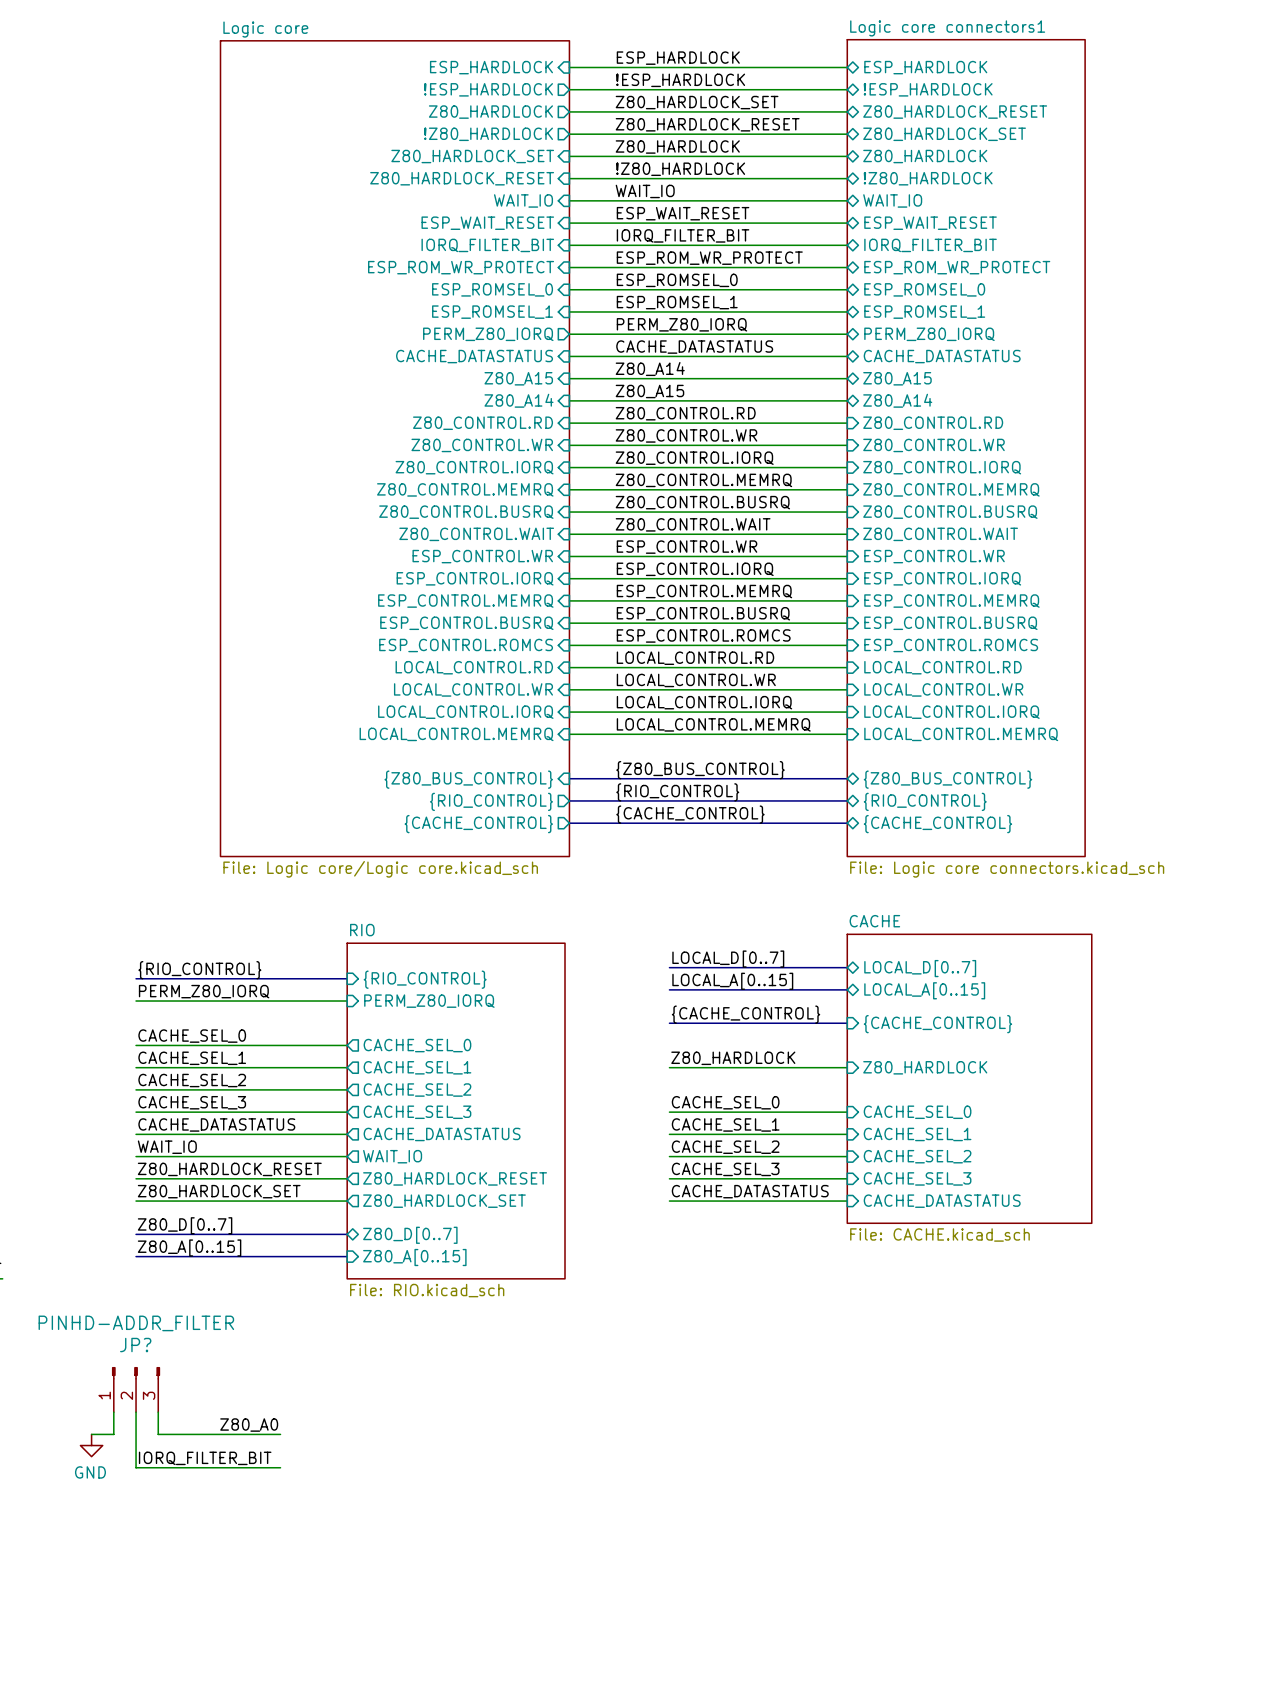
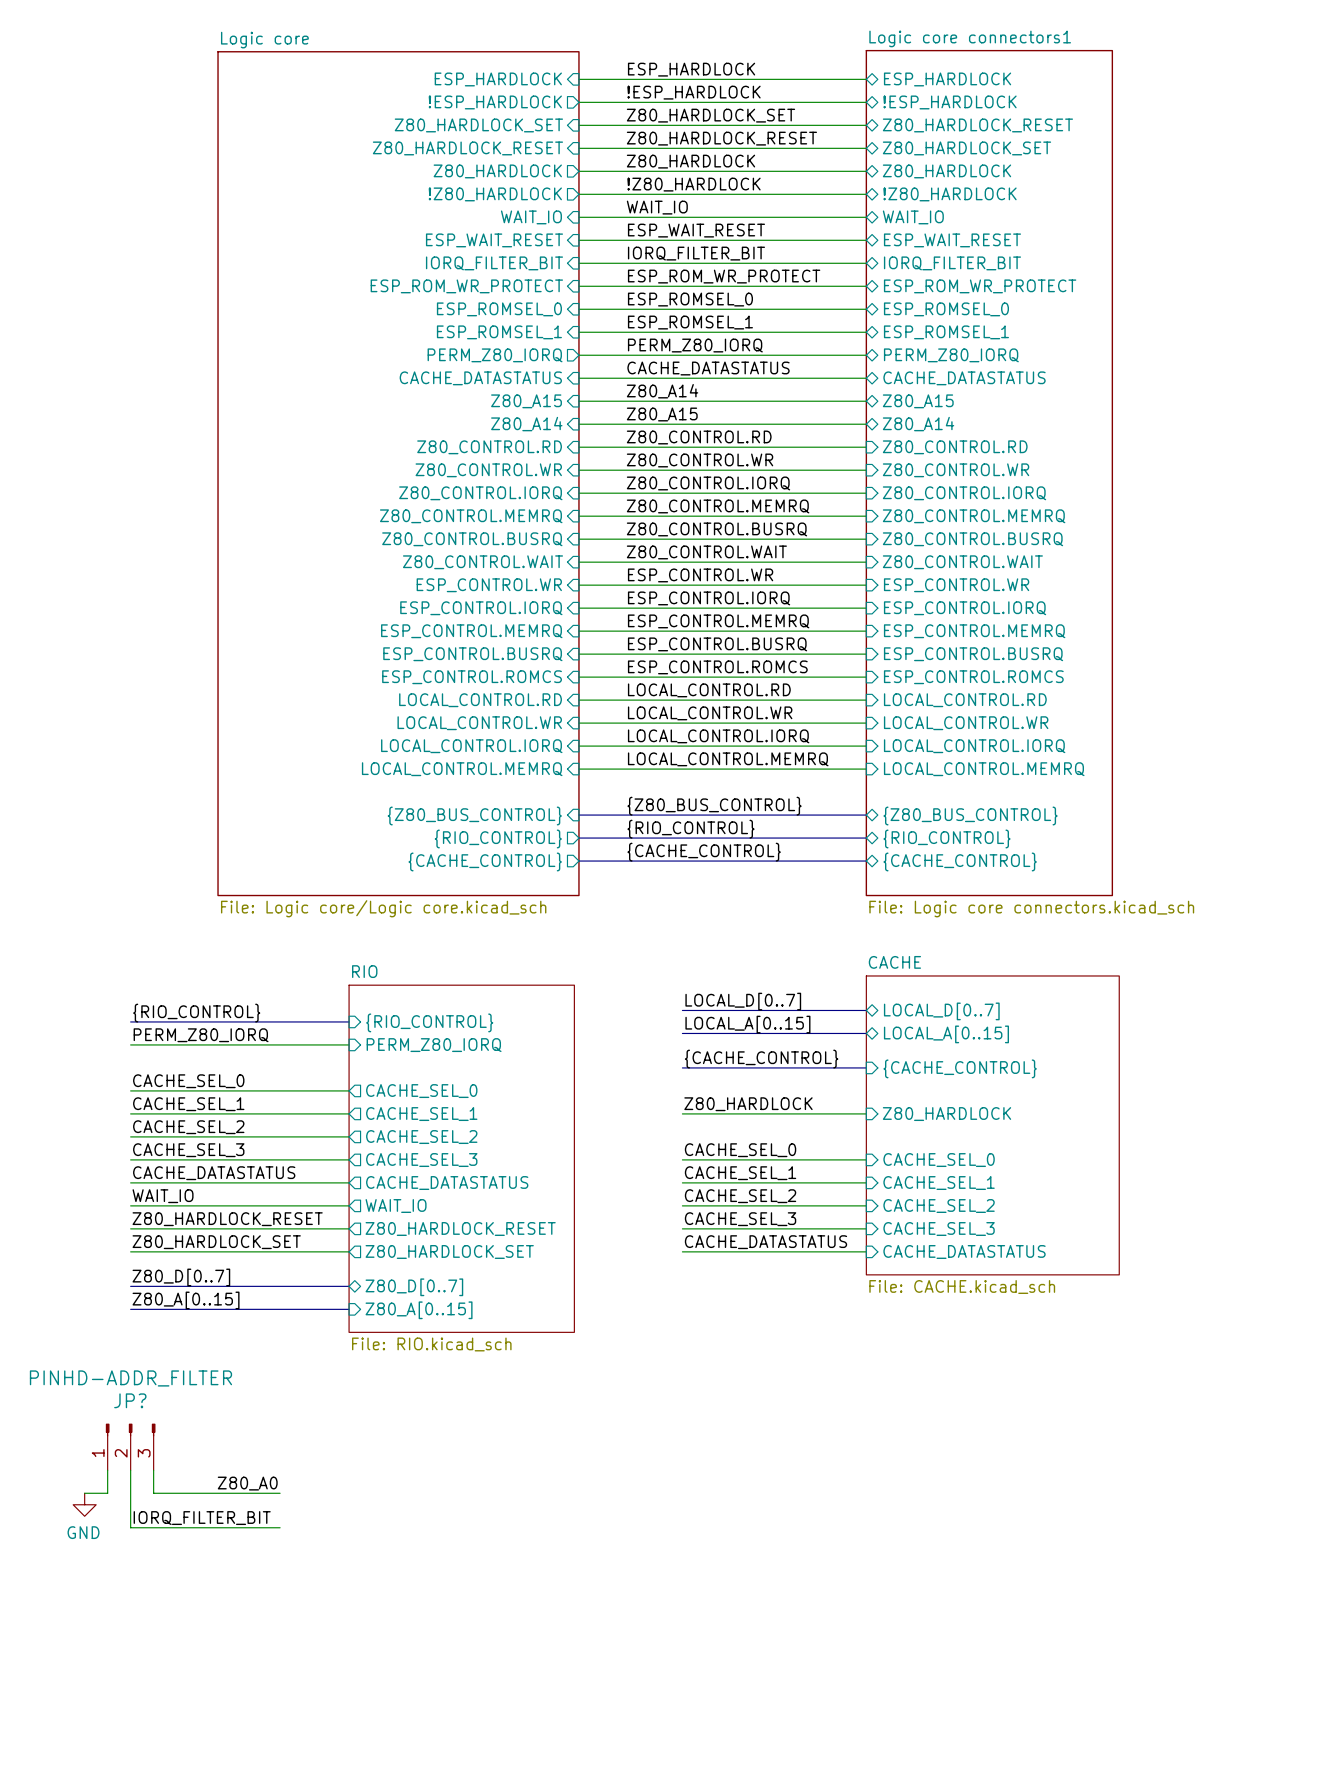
sheet pin shape: output (490, 112) -> input (478, 125)
sheet pin: Z80_HARDLOCK (490, 112) -> Z80_HARDLOCK_SET (478, 125)
sheet pin shape: output (488, 134) -> input (467, 148)
sheet pin: !Z80_HARDLOCK (488, 134) -> Z80_HARDLOCK_RESET (467, 148)
sheet pin shape: input (472, 156) -> output (497, 171)
sheet pin: Z80_HARDLOCK_SET (472, 156) -> Z80_HARDLOCK (497, 171)
sheet pin shape: input (462, 178) -> output (495, 194)
sheet pin: Z80_HARDLOCK_RESET (462, 178) -> !Z80_HARDLOCK (495, 194)

